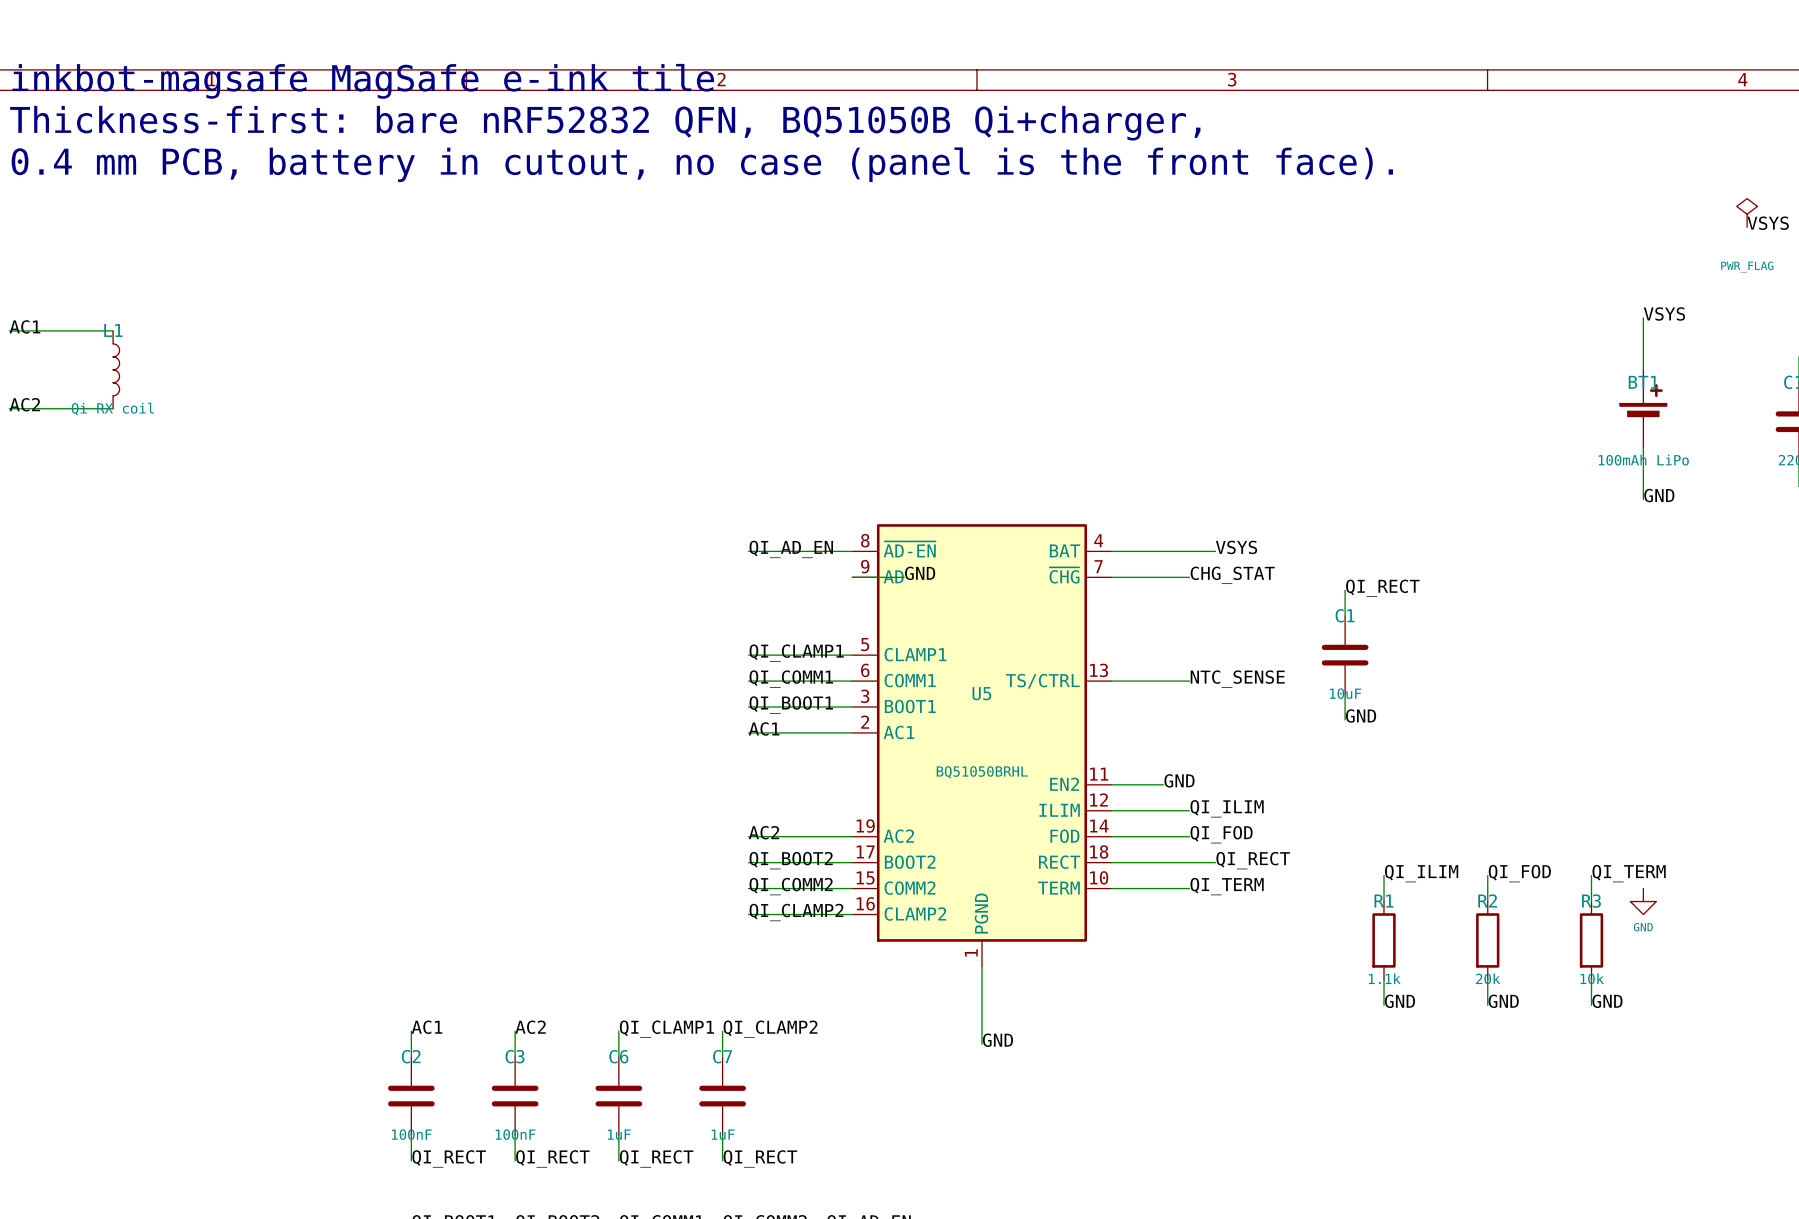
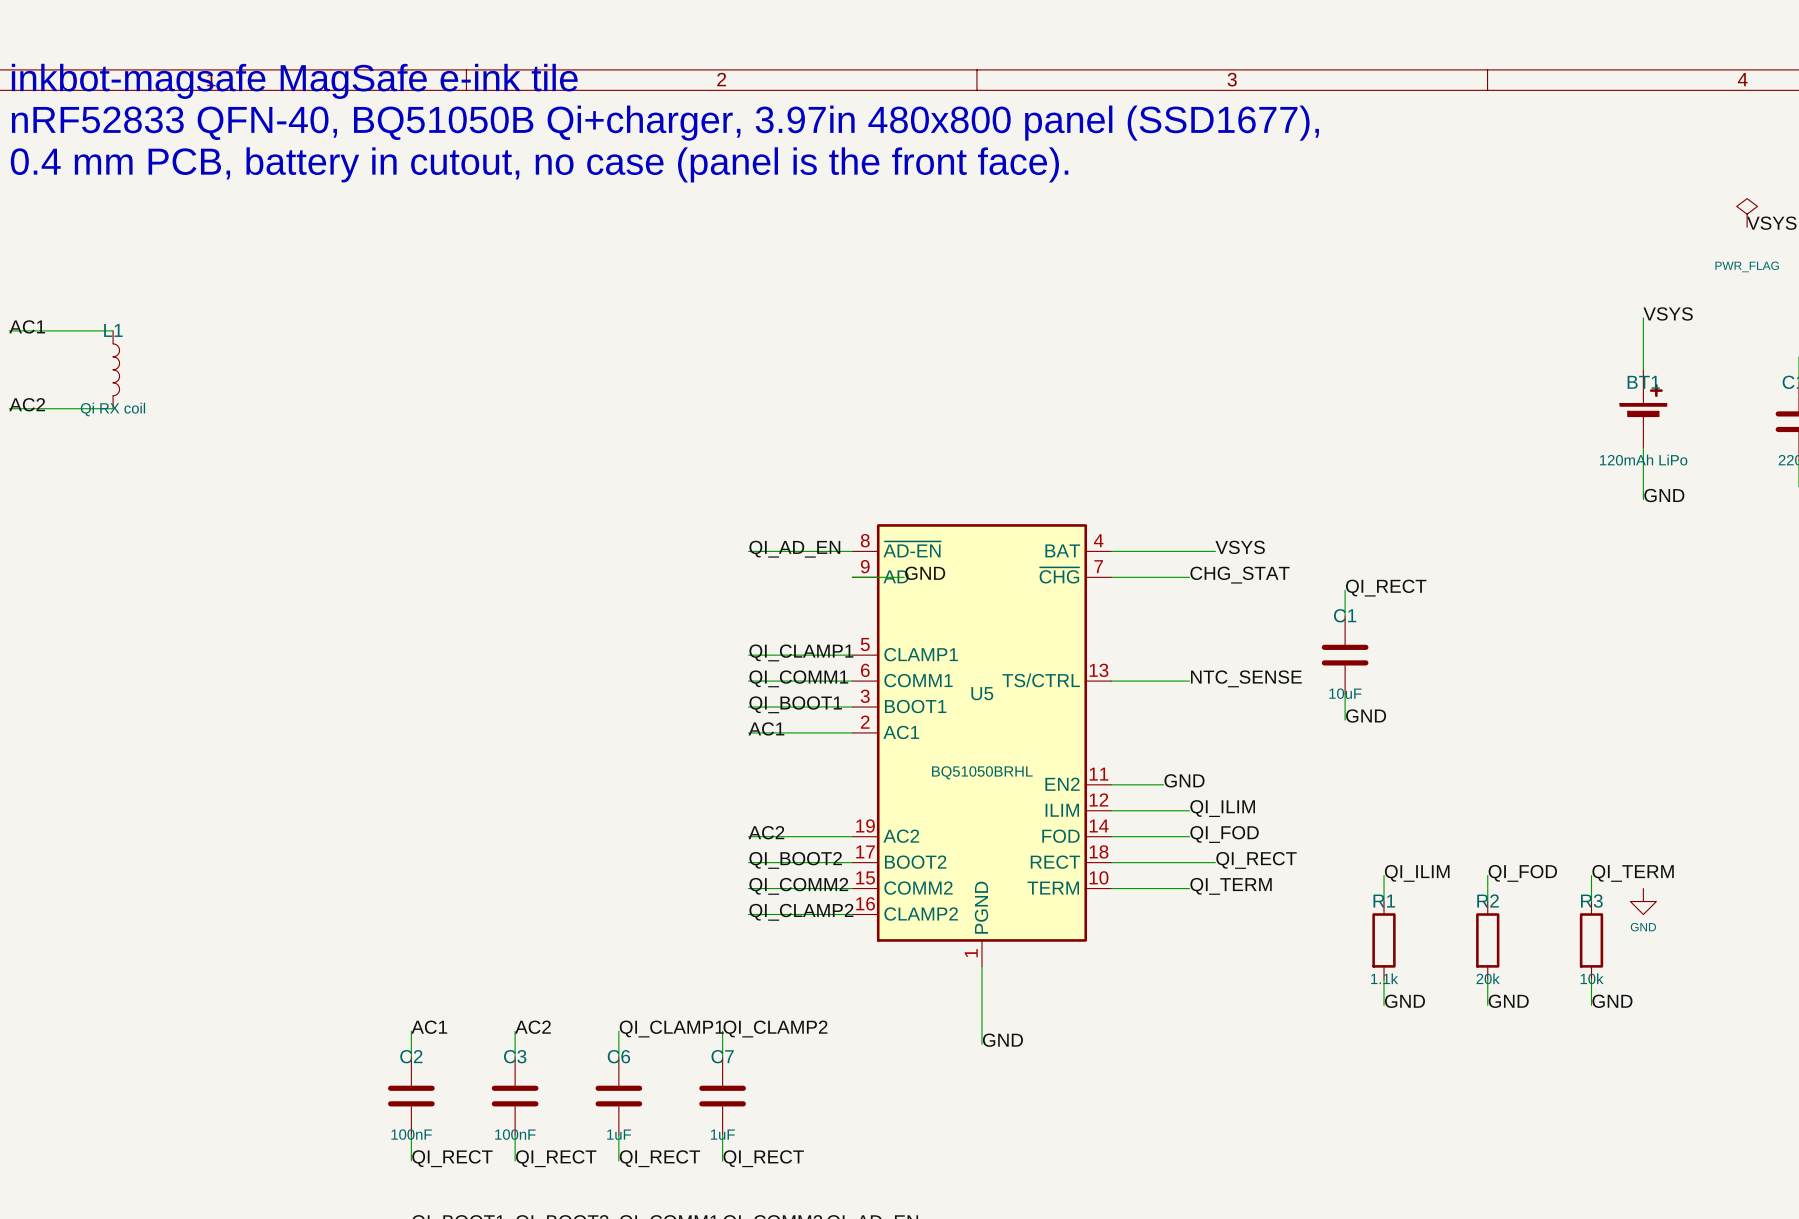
text: Thickness-first: bare nRF52832 QFN, BQ51050B Qi+charger, (605, 123) -> nRF52833 QFN-40, BQ51050B Qi+charger, 3.97in 480x800 panel (SSD1677), (665, 123)
BT1 value: 100mAh LiPo (1643, 460) -> 120mAh LiPo (1643, 460)

